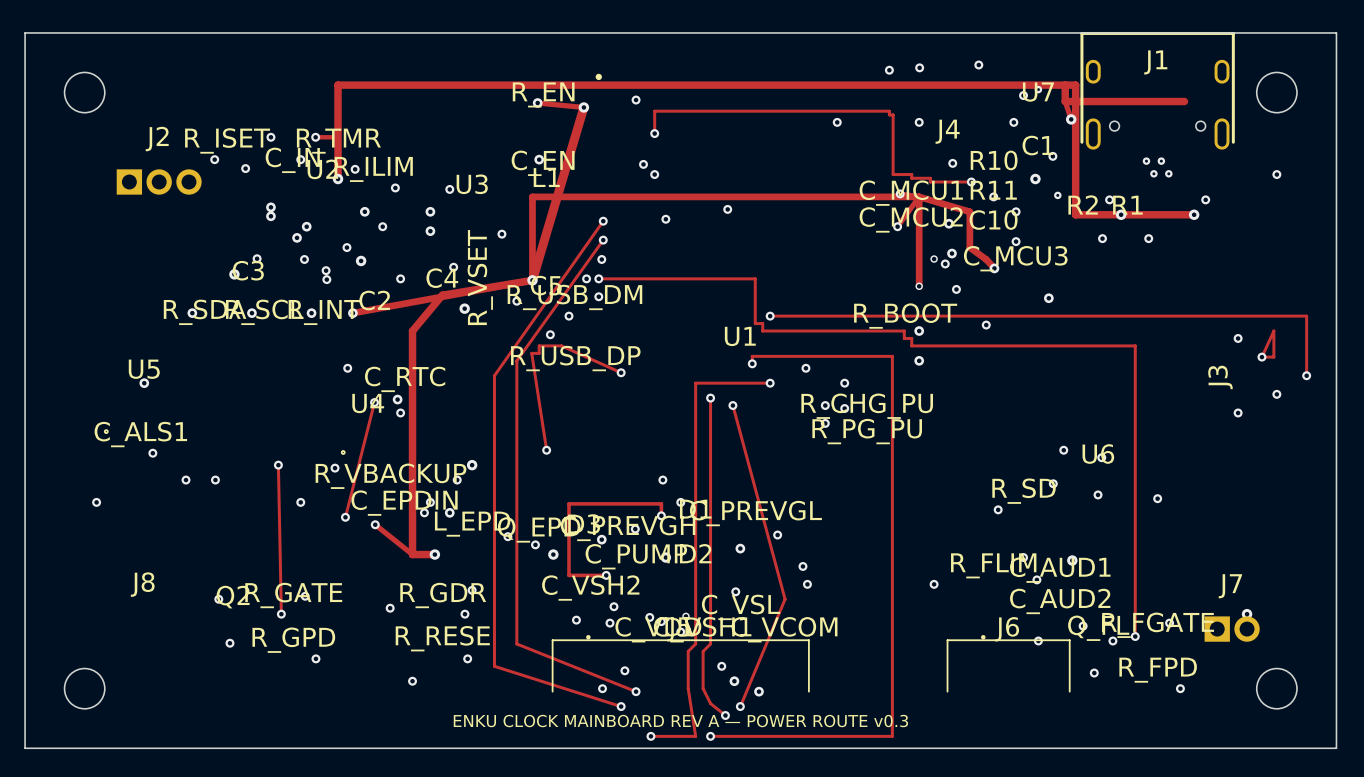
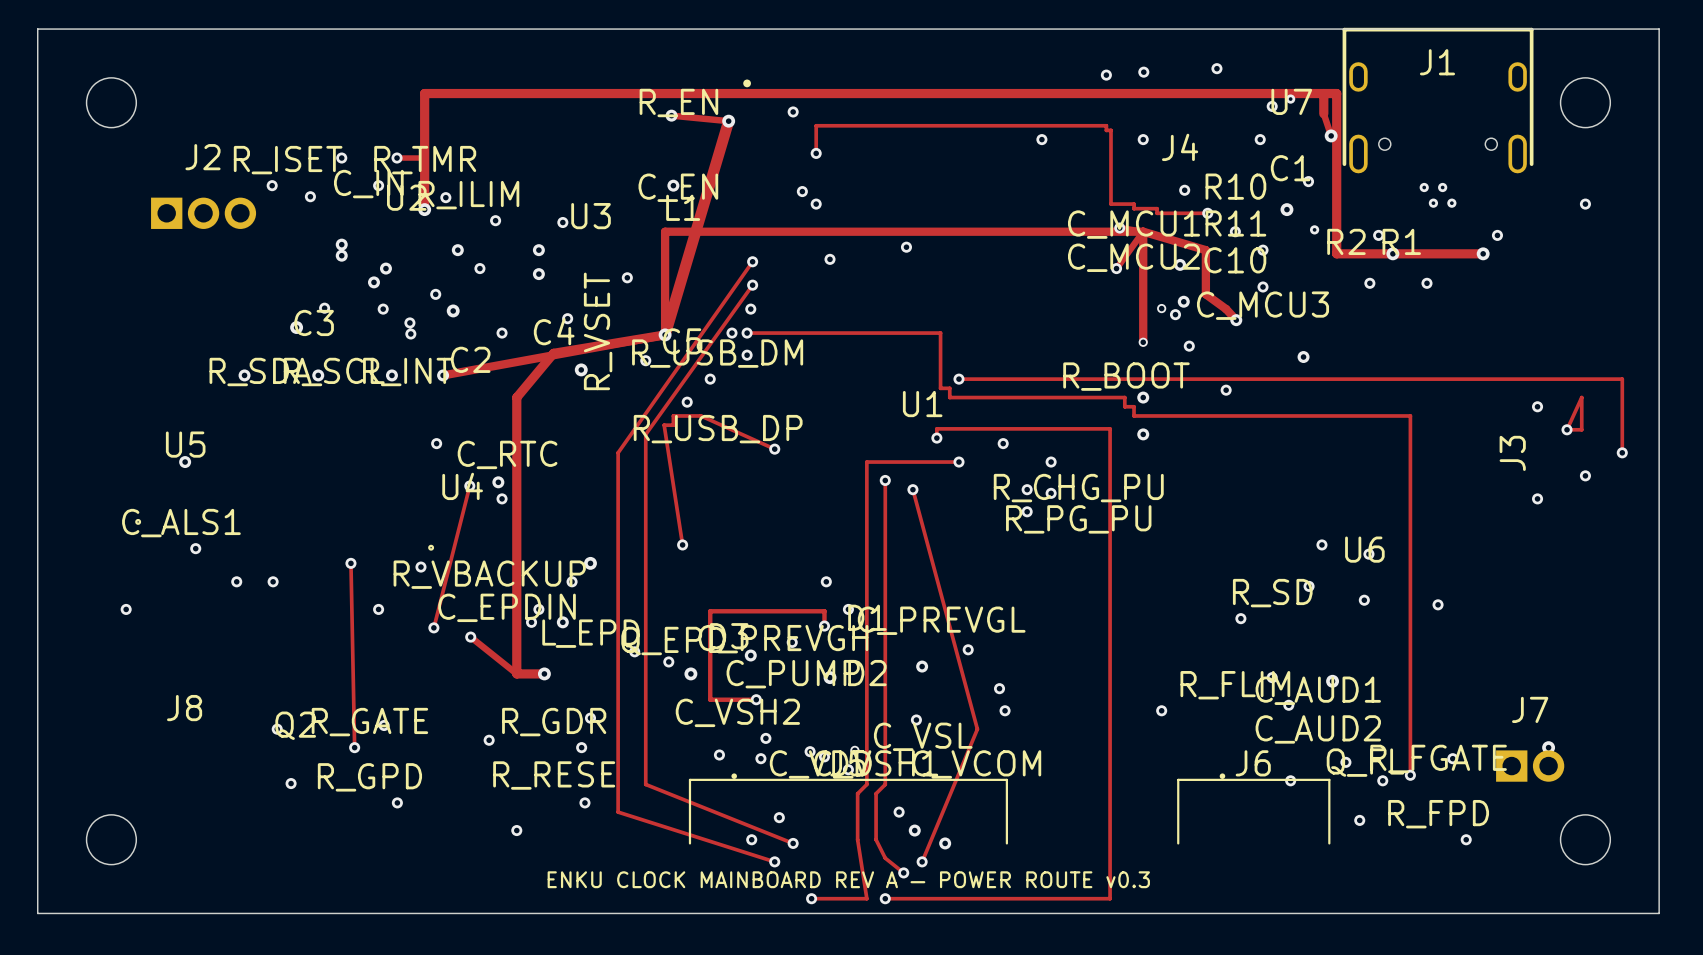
track: (1065, 101) (1184, 101) -> none

